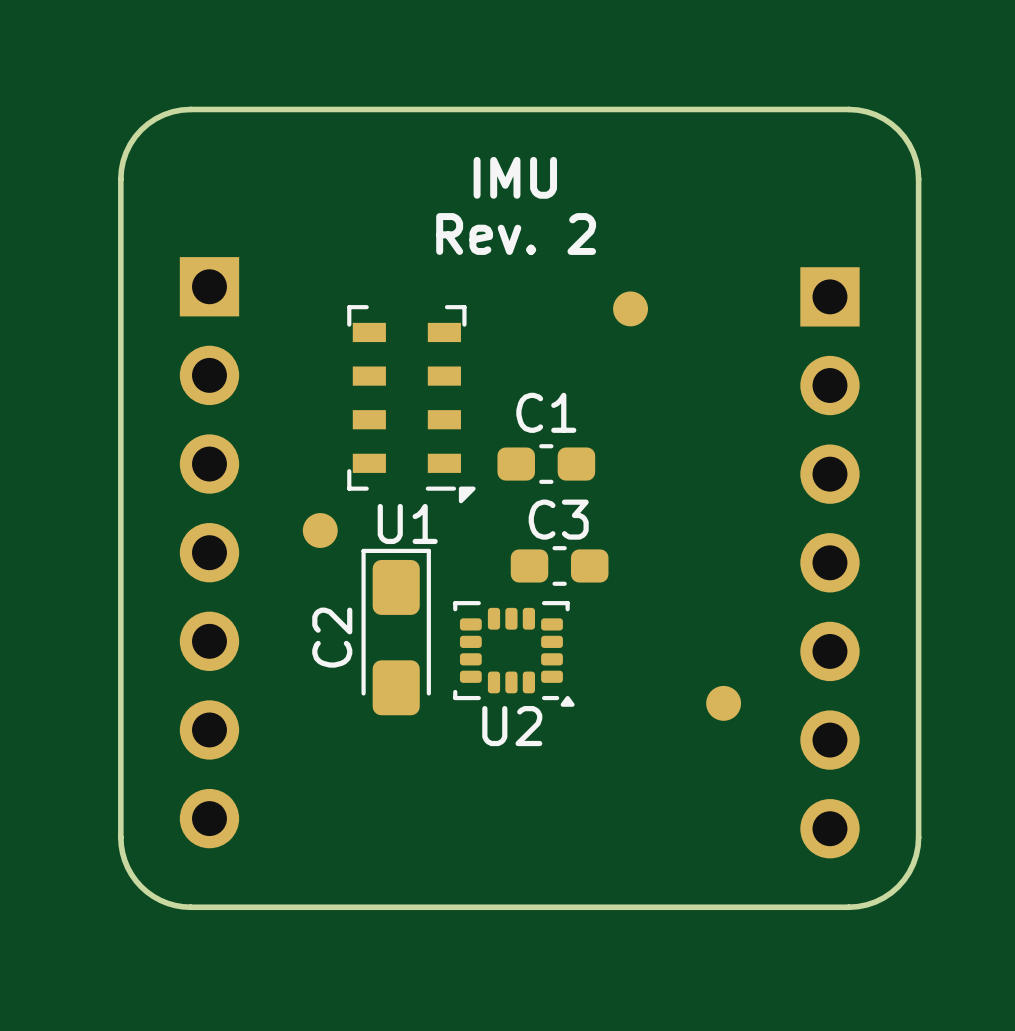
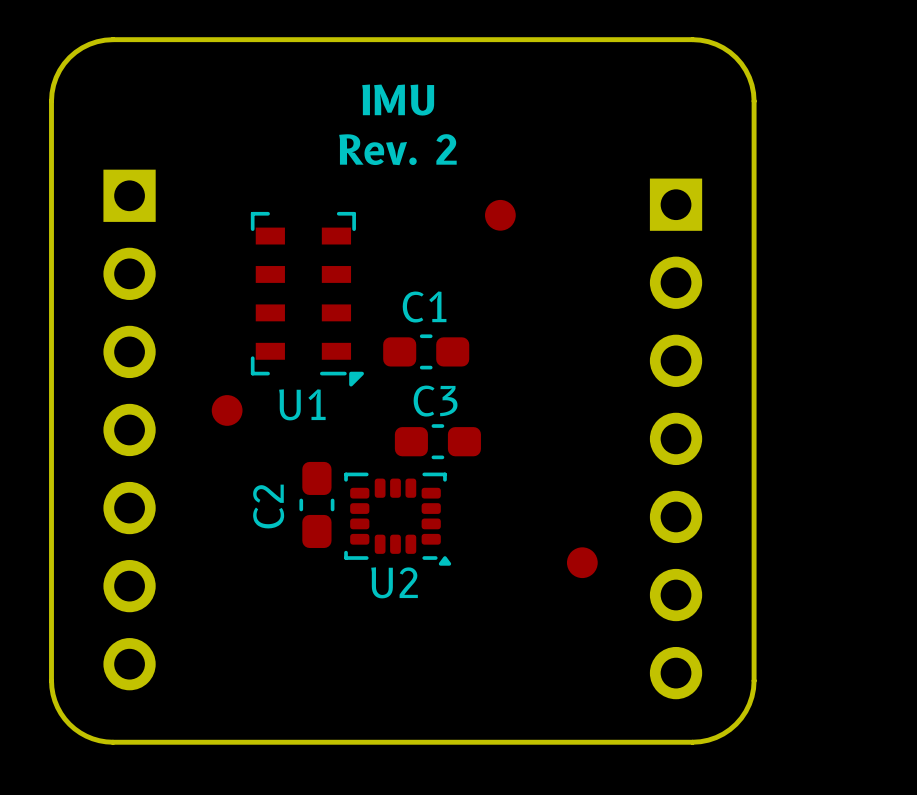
C2 footprint: [361, 548, 431, 716] -> [299, 461, 335, 548]

